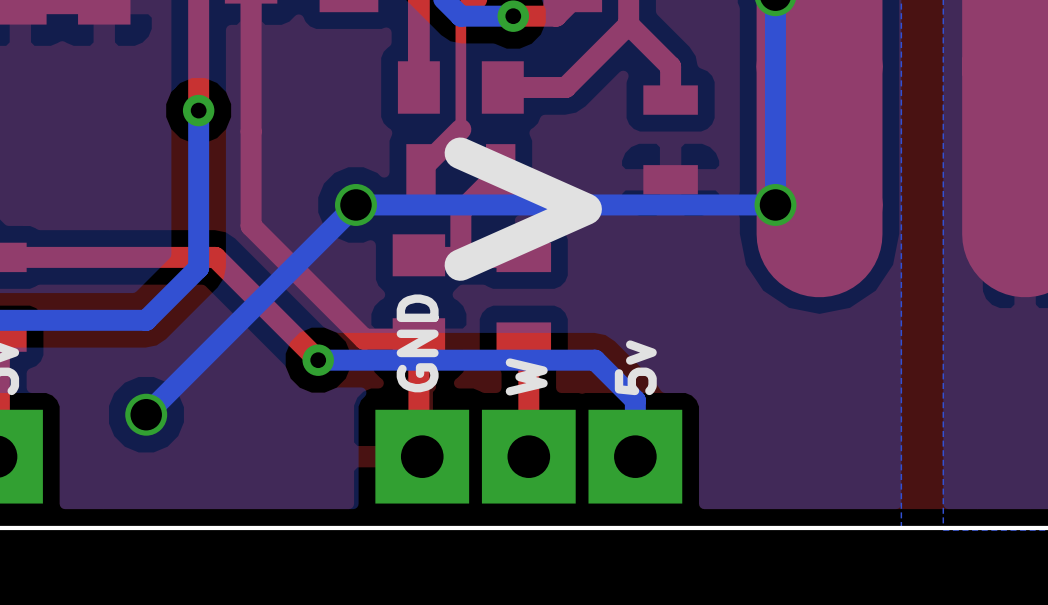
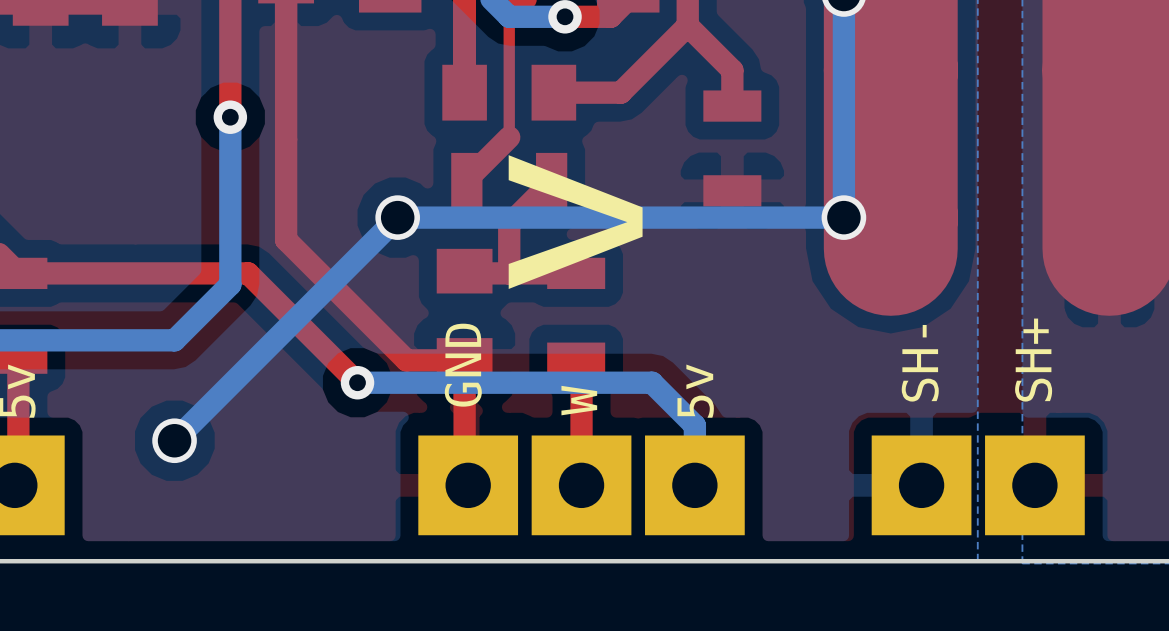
text: none -> SH- (920, 363)
text: none -> SH+ (1033, 360)
part: none -> (921, 485)
part: none -> (1034, 485)

